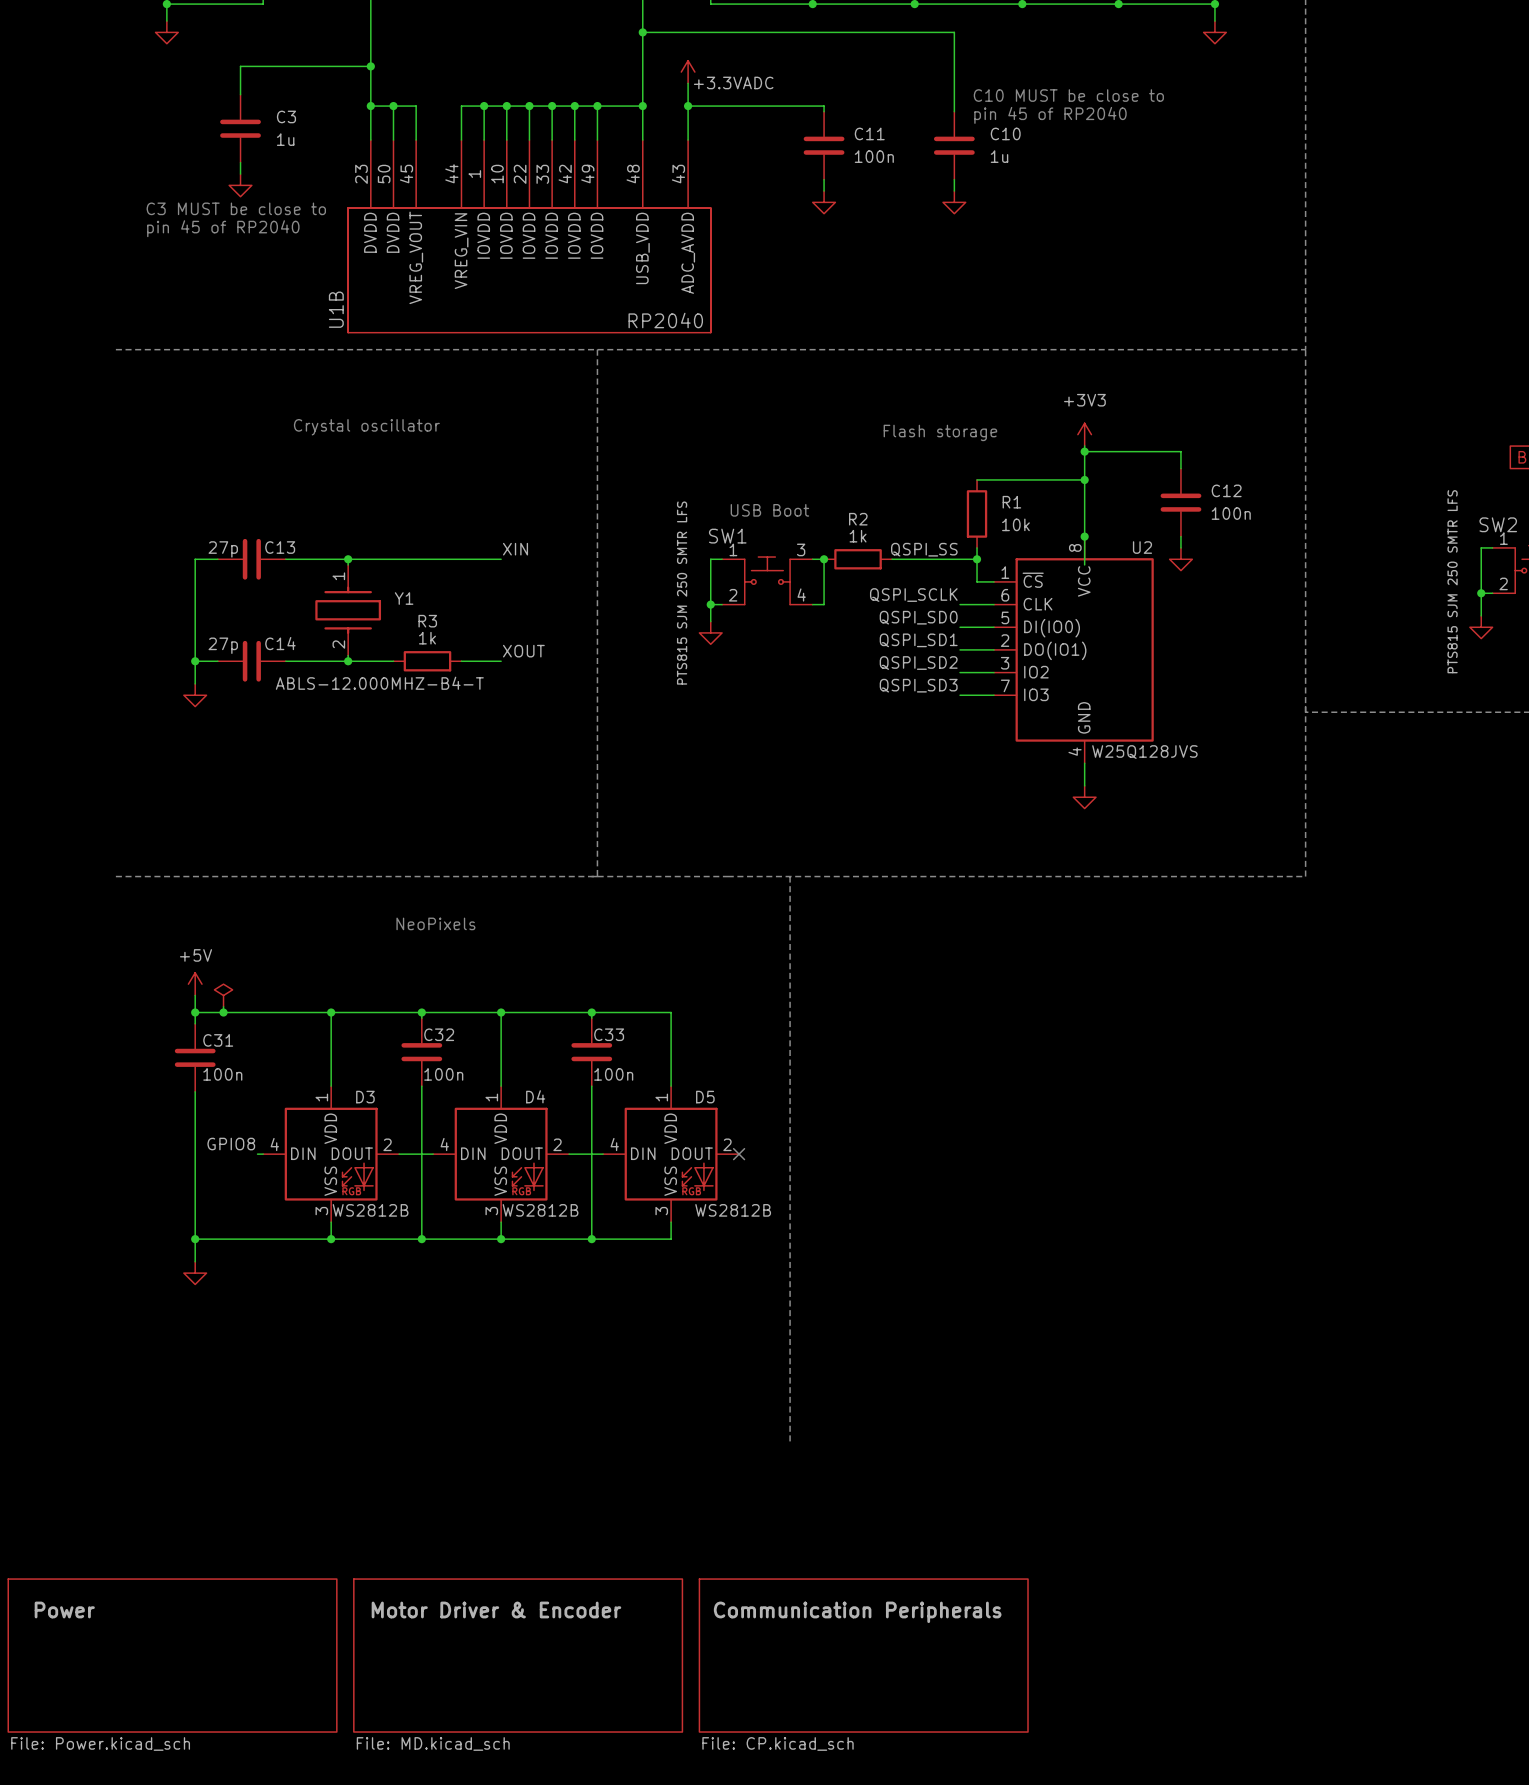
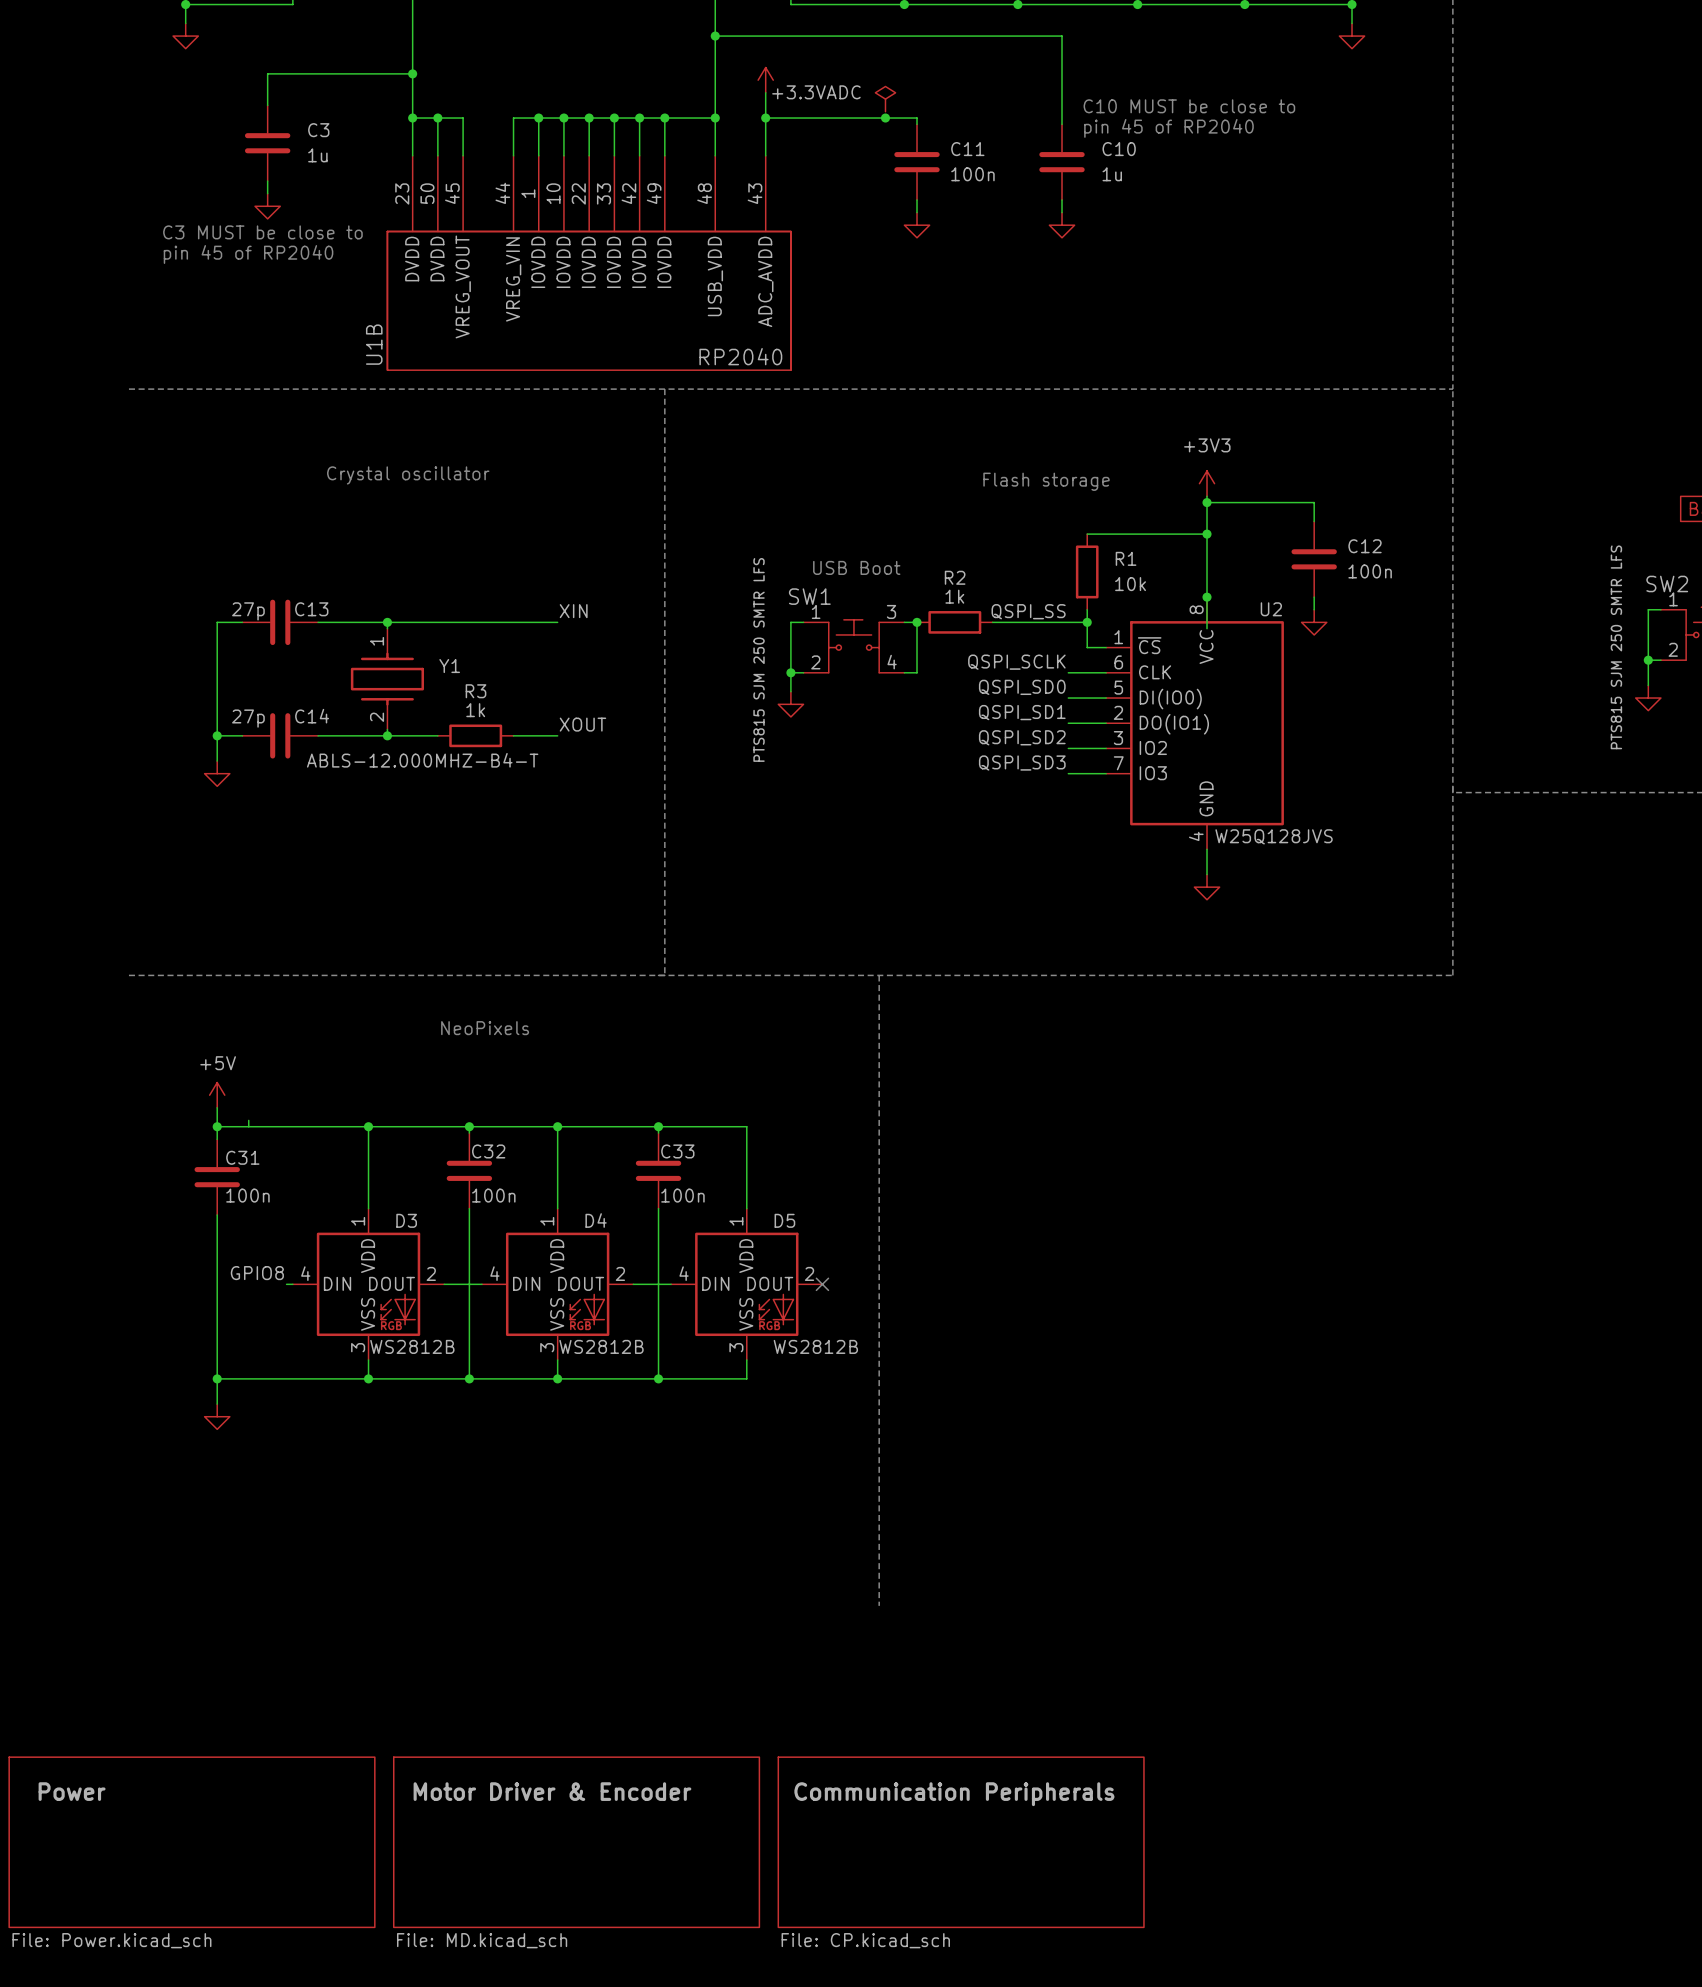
power symbol: none -> (885, 99)
junction: none -> (885, 118)
power symbol: (223, 995) -> none
junction: (223, 1012) -> none

